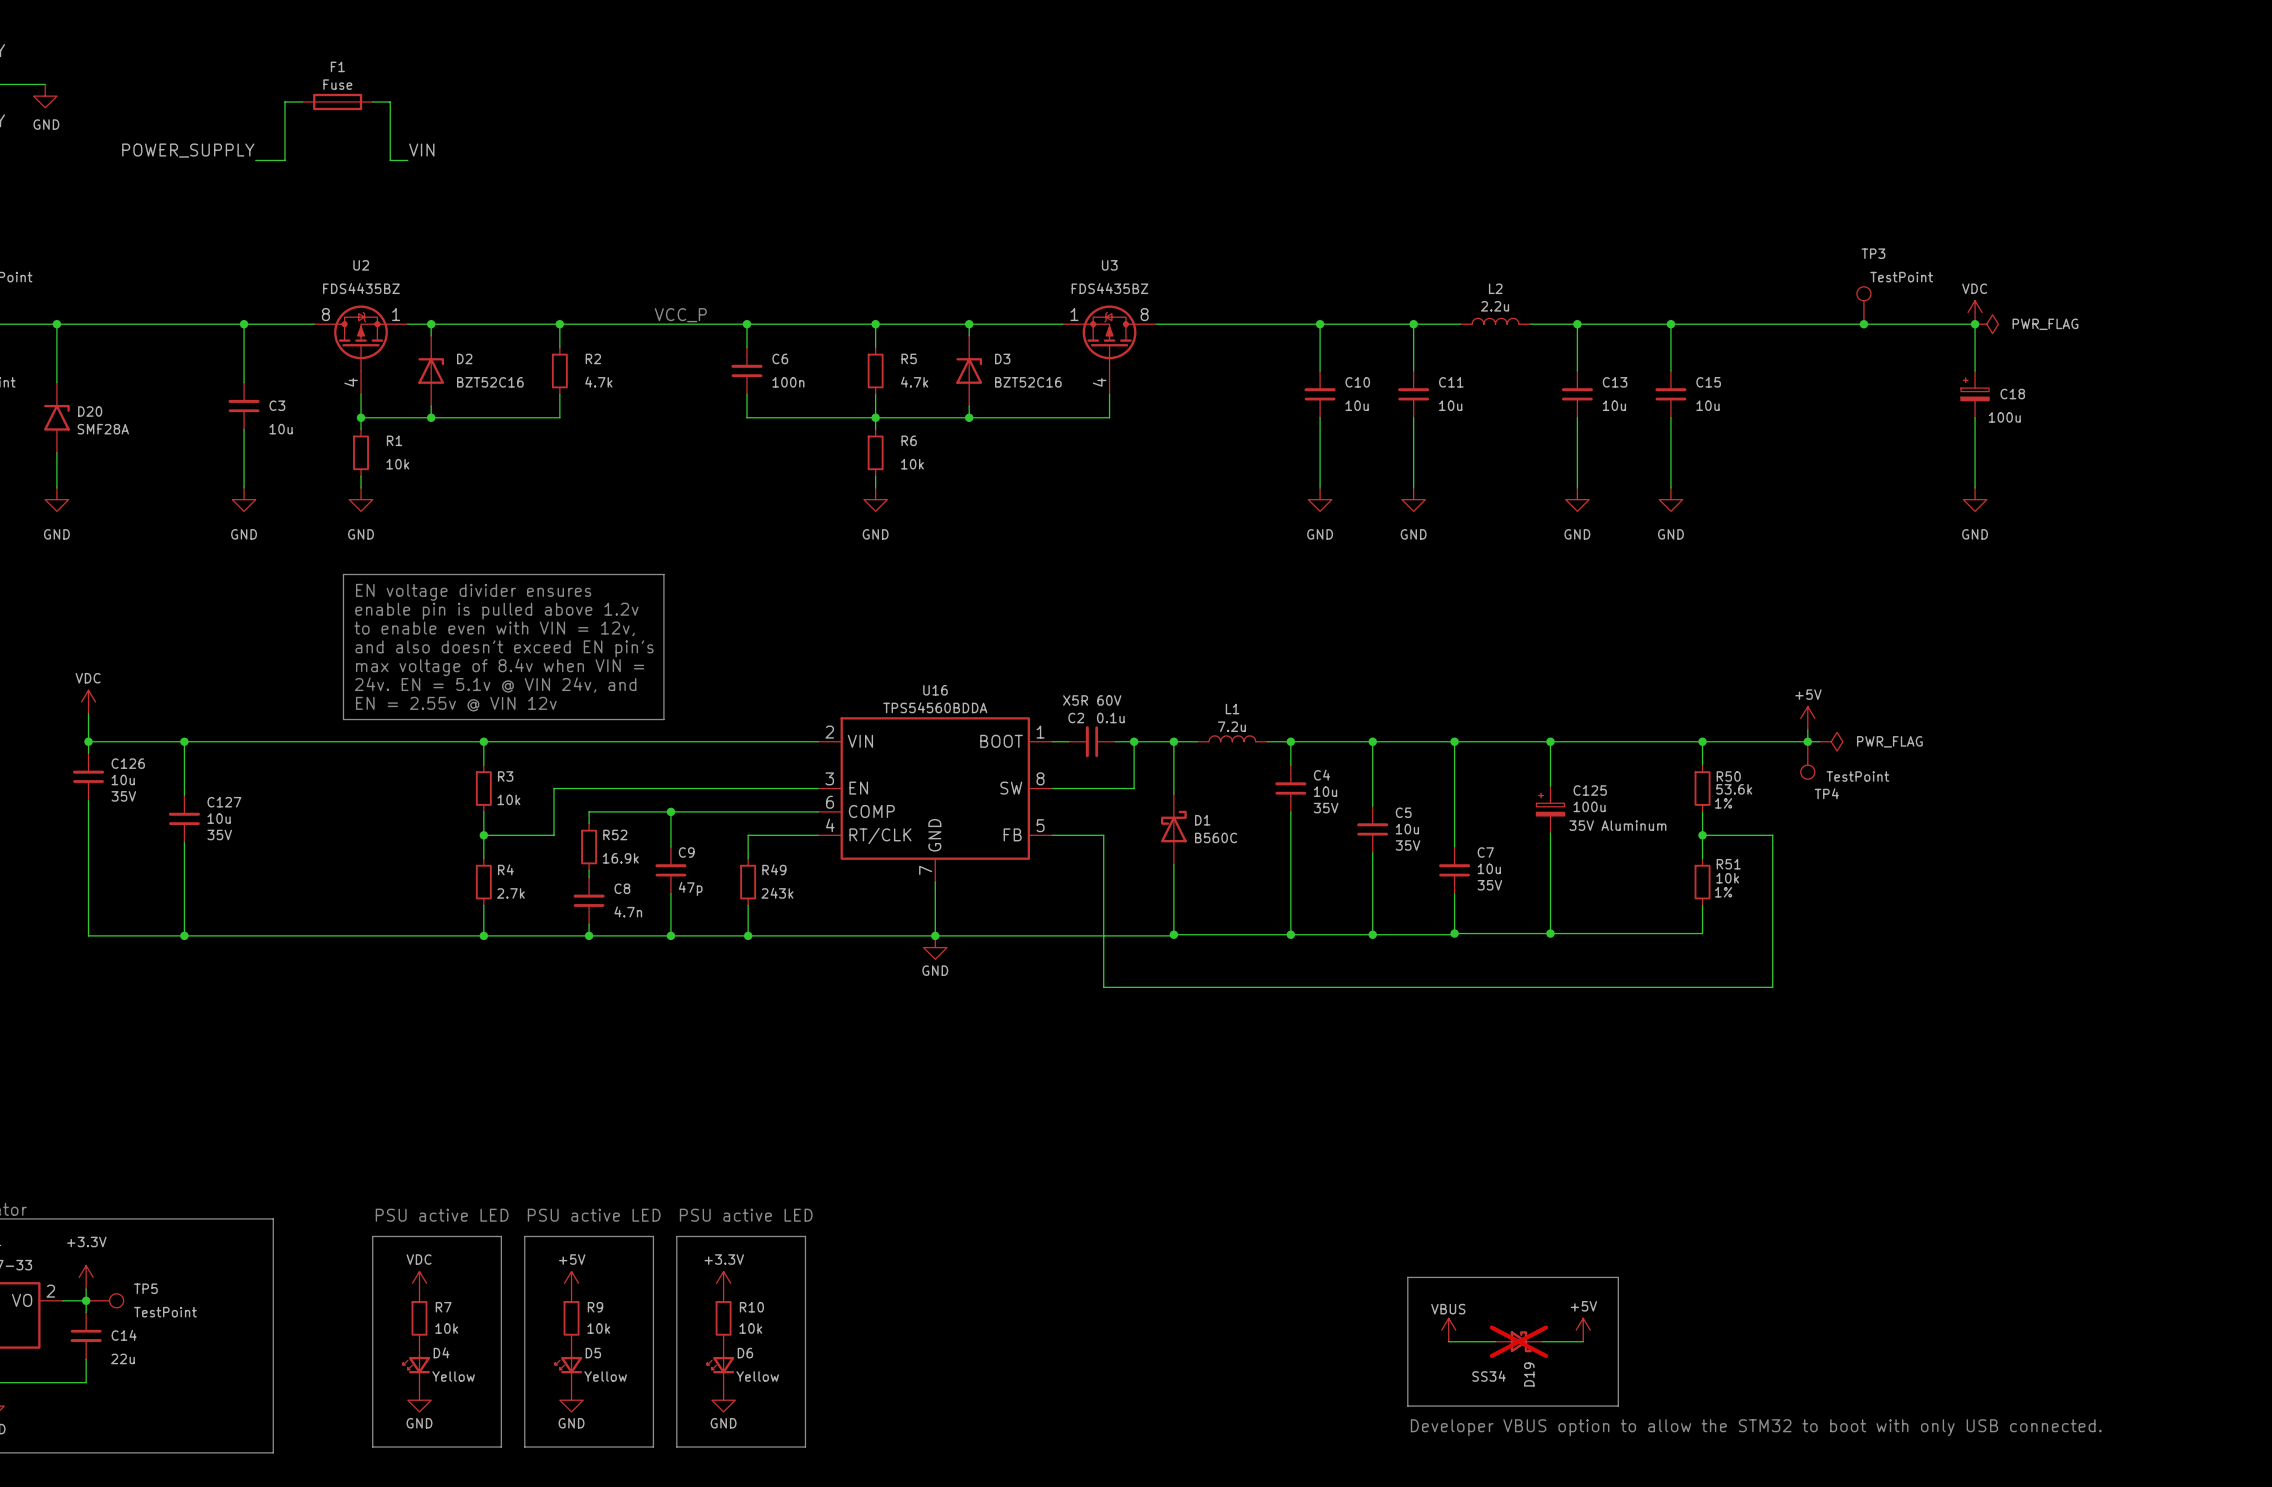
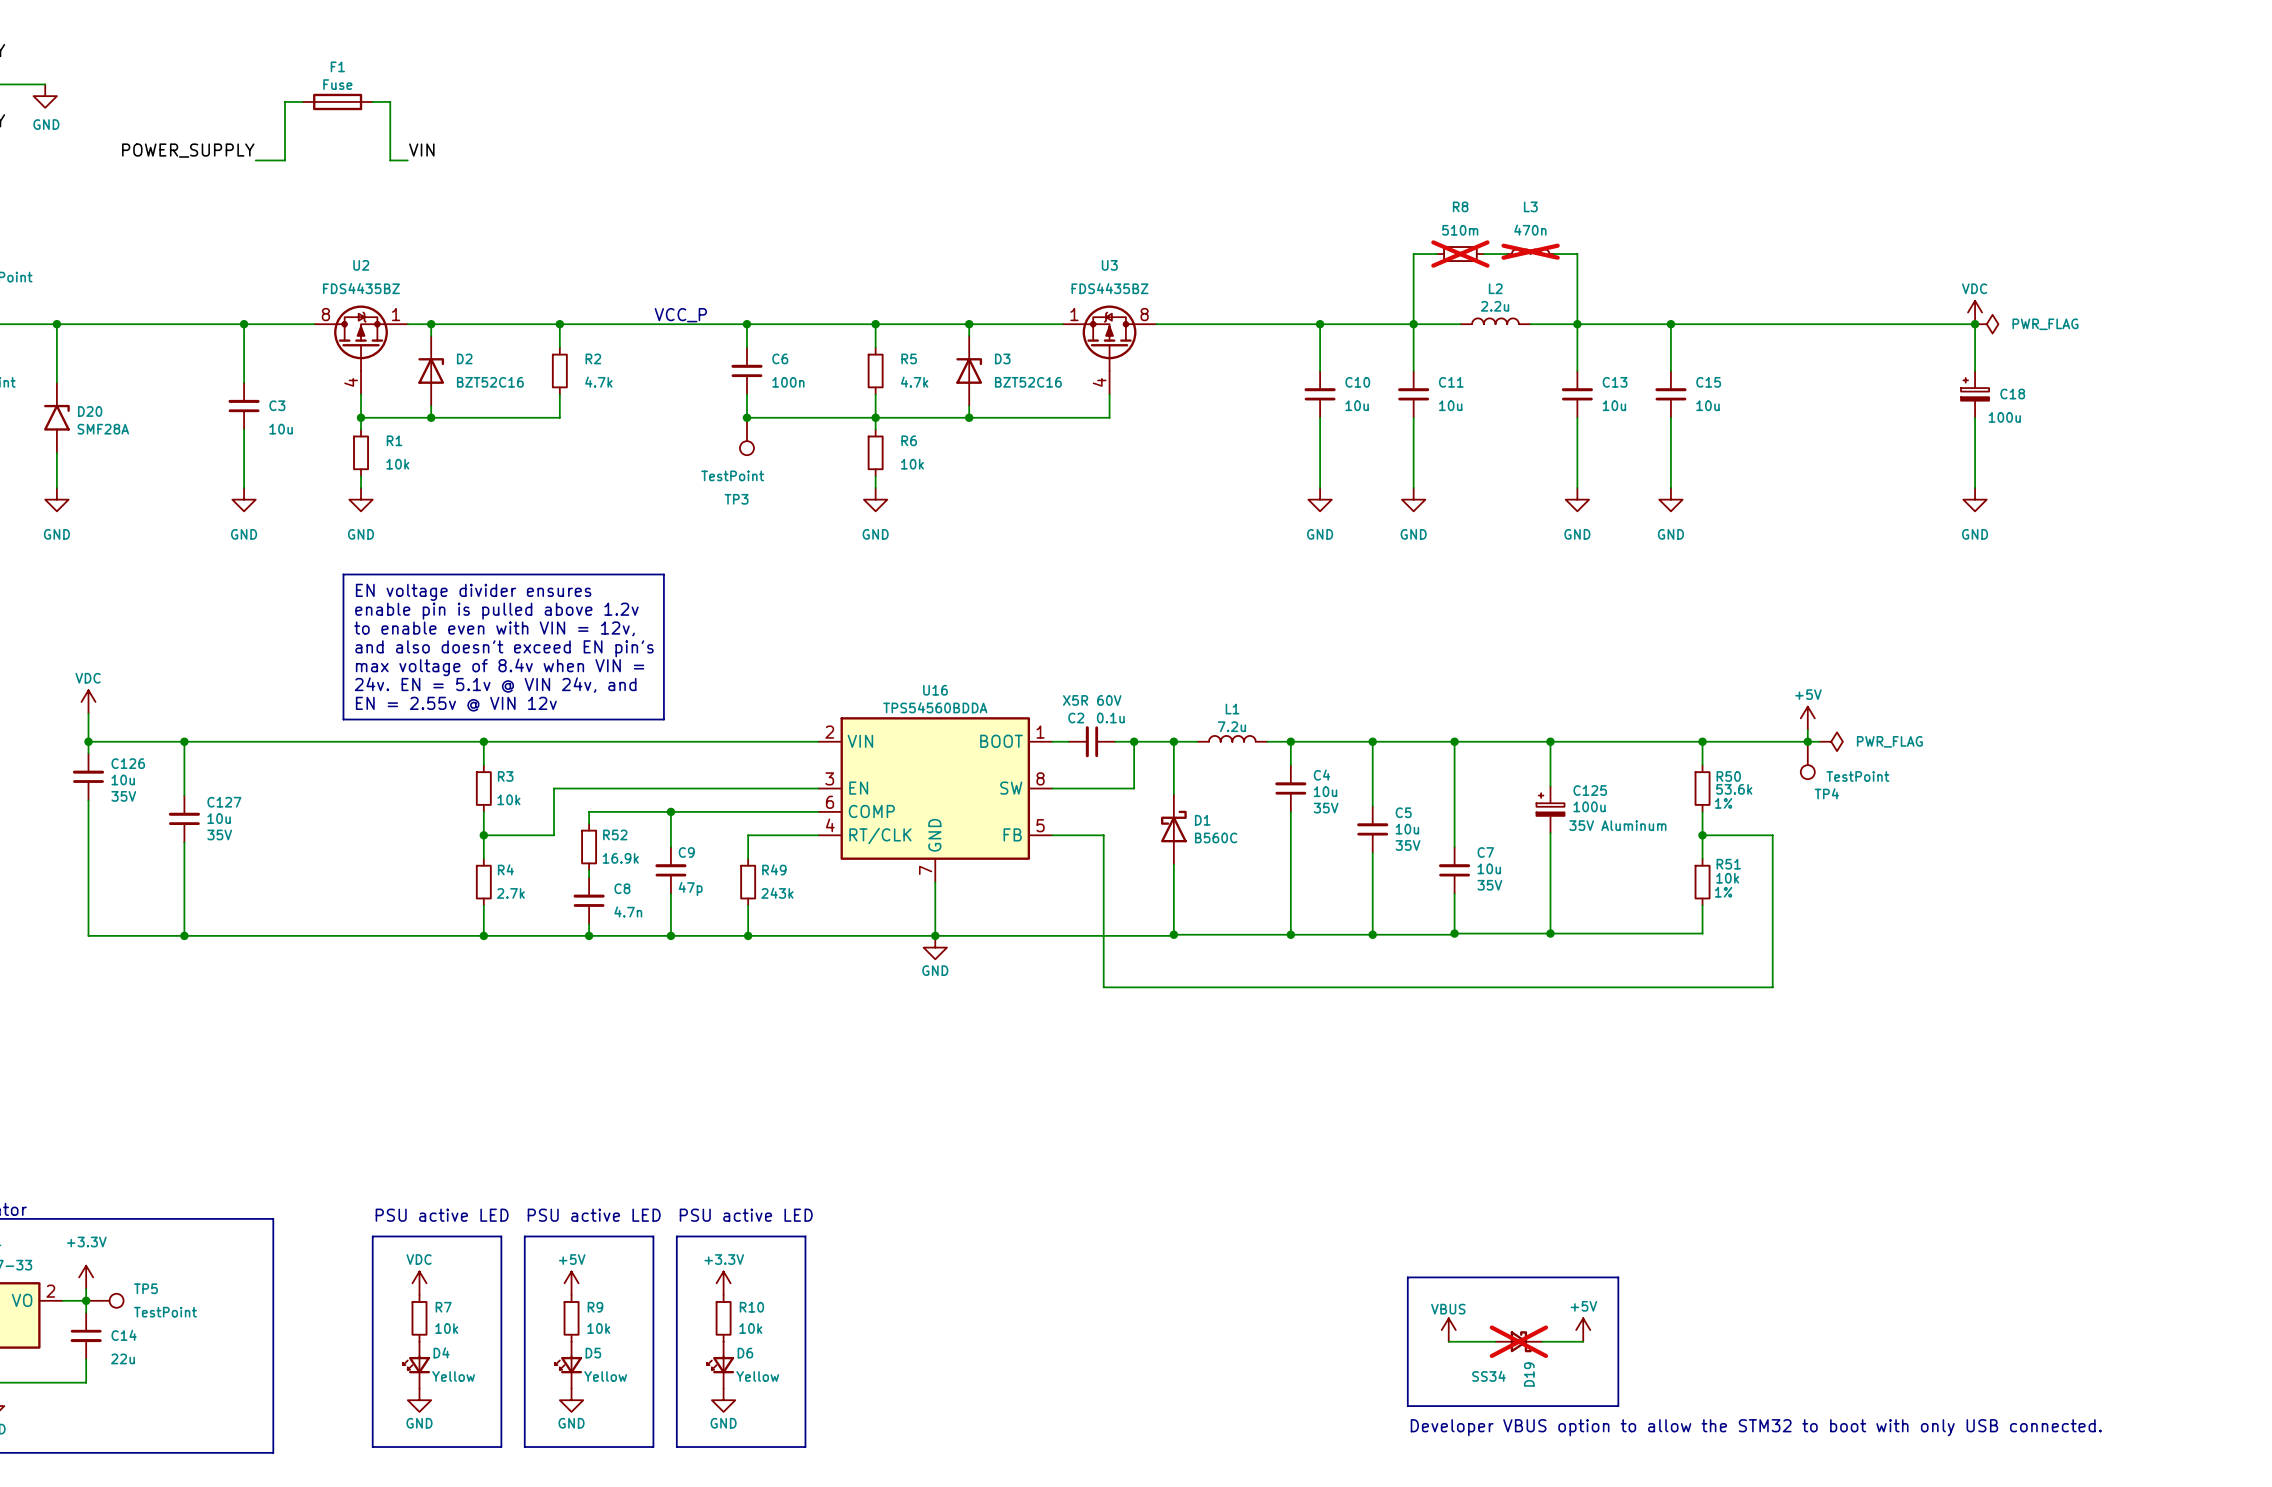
L3: none -> 470n (1530, 251)
wire: none -> (1437, 254) (1413, 254) (1413, 324)
R8: none -> 510m (1460, 254)
wire: none -> (1483, 254) (1507, 254)
wire: none -> (1553, 254) (1577, 254) (1577, 324)
TP3 value position: TestPoint (1901, 277) -> TestPoint (732, 475)
TP3 rotation: 0° (1863, 293) -> 180° (746, 448)
TP3 position: (1863, 305) -> (746, 436)
junction: (1863, 324) -> none
junction: none -> (746, 417)

